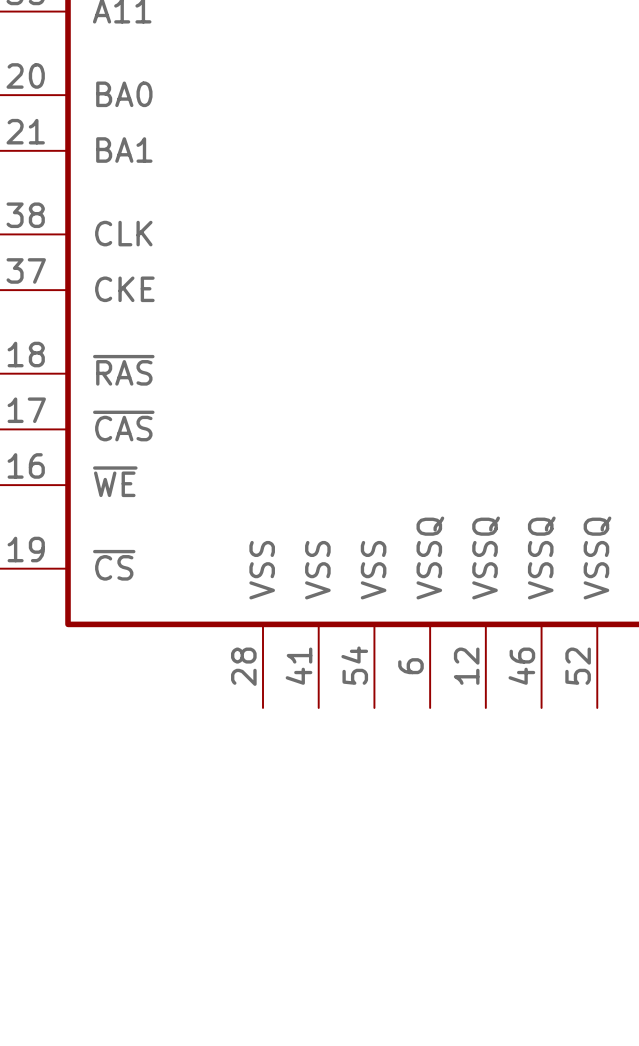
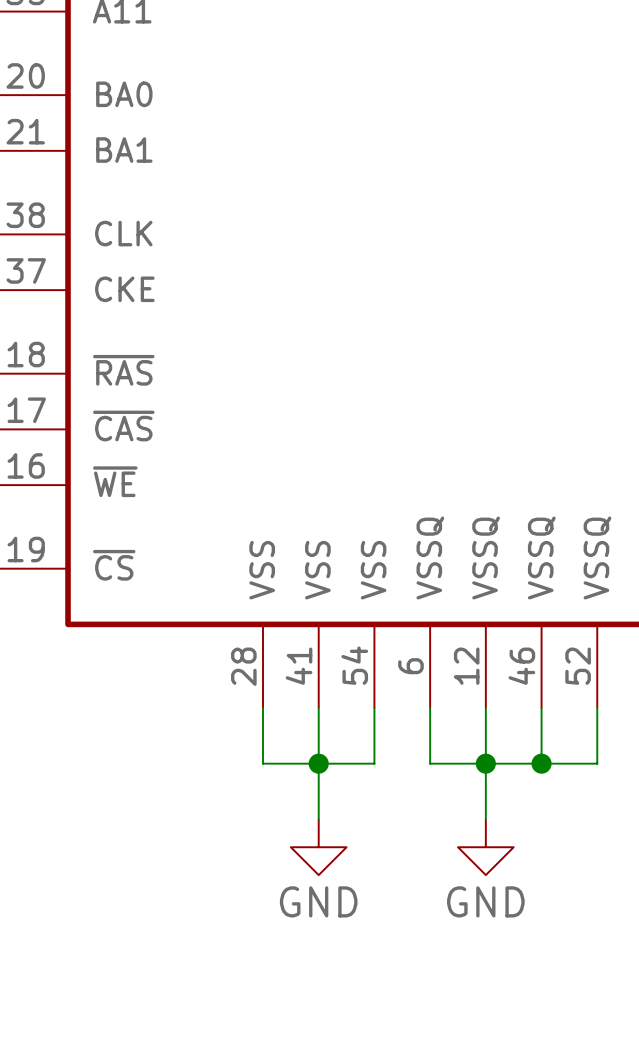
wire: none -> (263, 707) (263, 763) (374, 763) (374, 707)
wire: none -> (318, 707) (318, 819)
wire: none -> (430, 707) (430, 763) (597, 763) (597, 707)
wire: none -> (485, 707) (485, 819)
wire: none -> (541, 707) (541, 763)
junction: none -> (318, 763)
junction: none -> (485, 763)
junction: none -> (541, 763)
power symbol: none -> GND (318, 847)
power symbol: none -> GND (485, 847)

